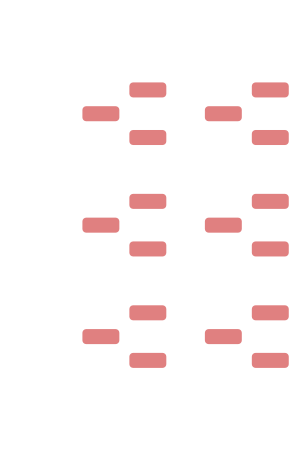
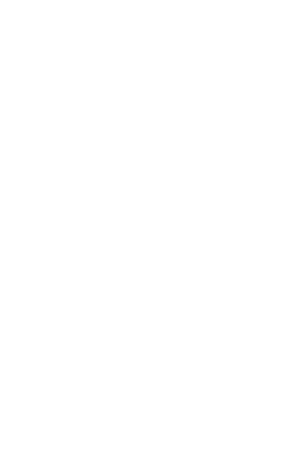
part: (124, 113) -> none
part: (246, 113) -> none
part: (124, 225) -> none
part: (246, 225) -> none
part: (124, 336) -> none
part: (246, 336) -> none

